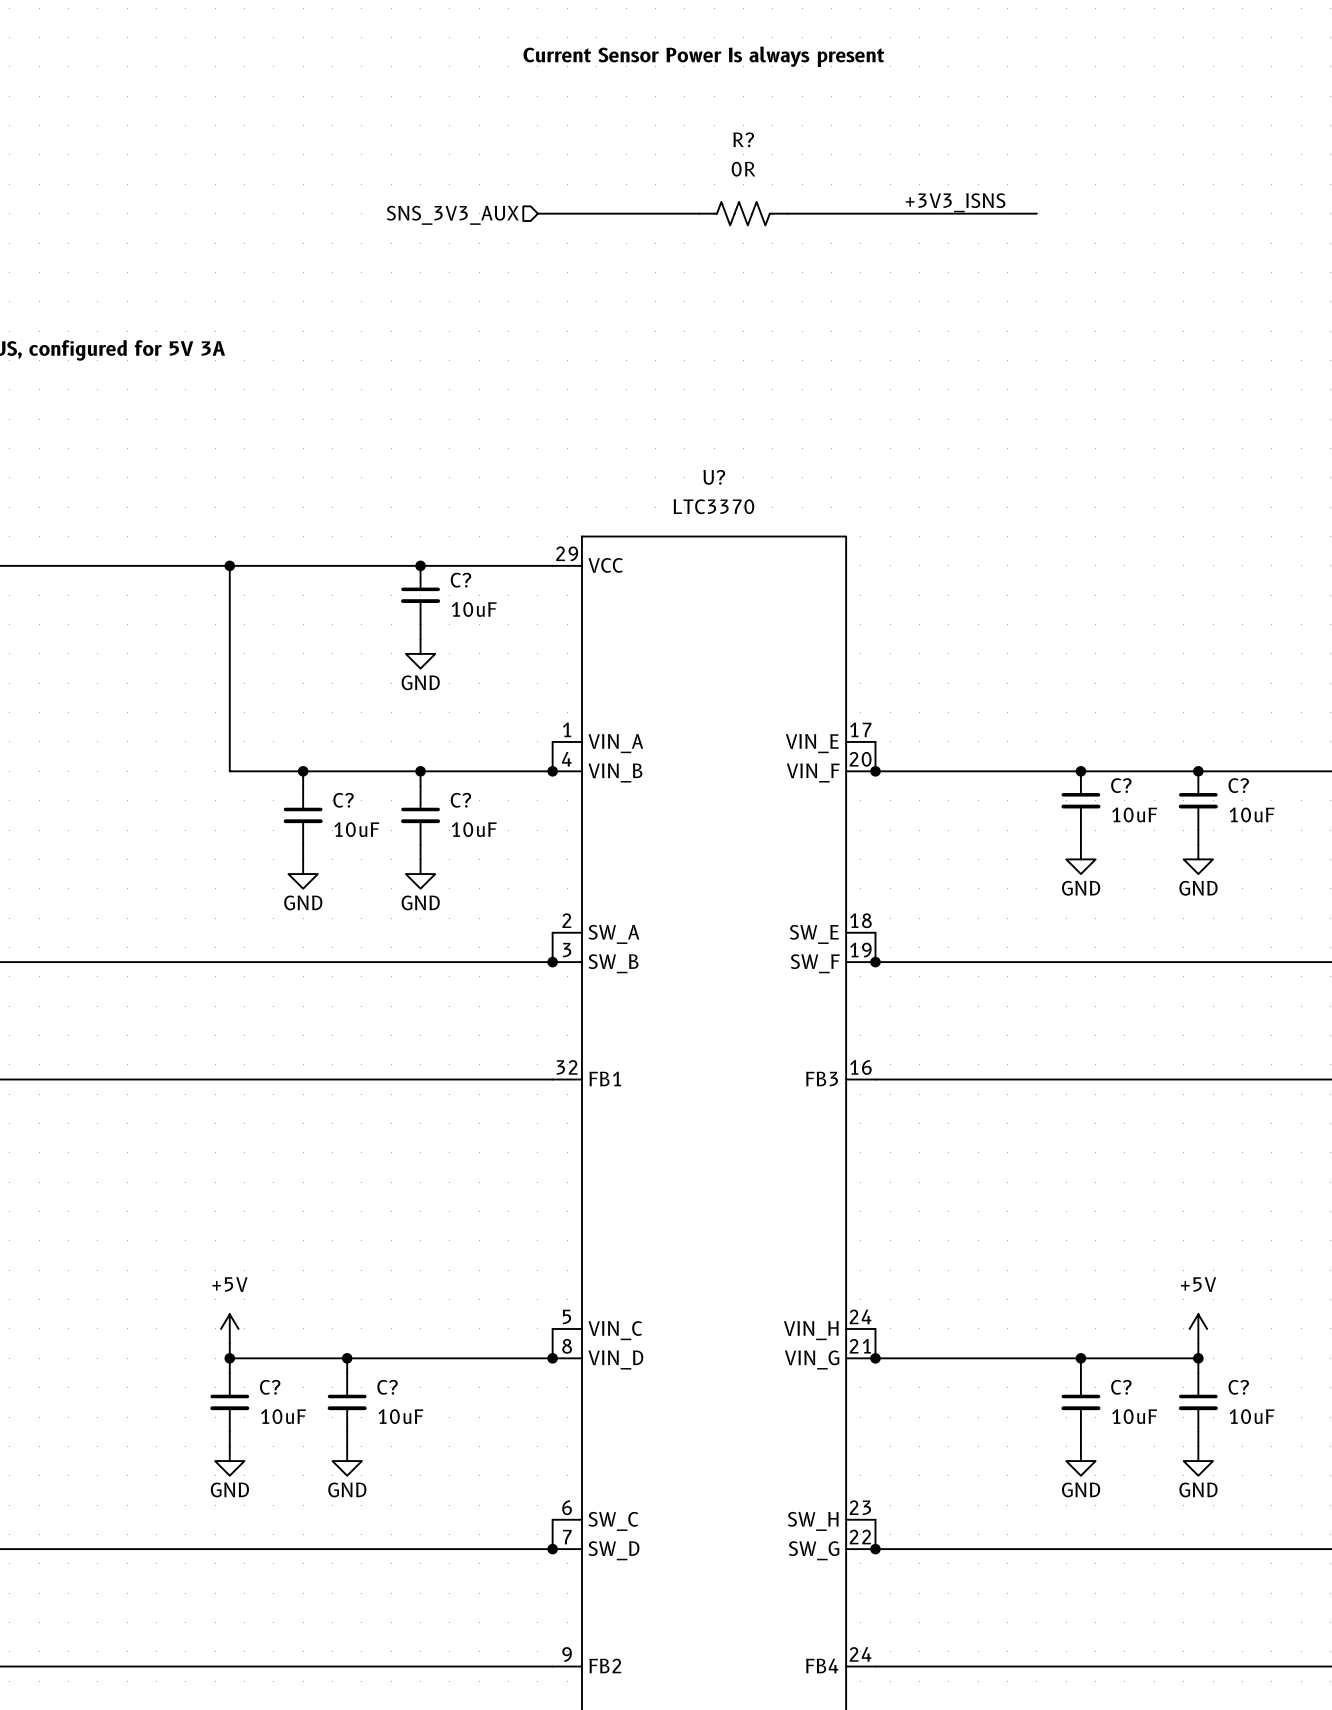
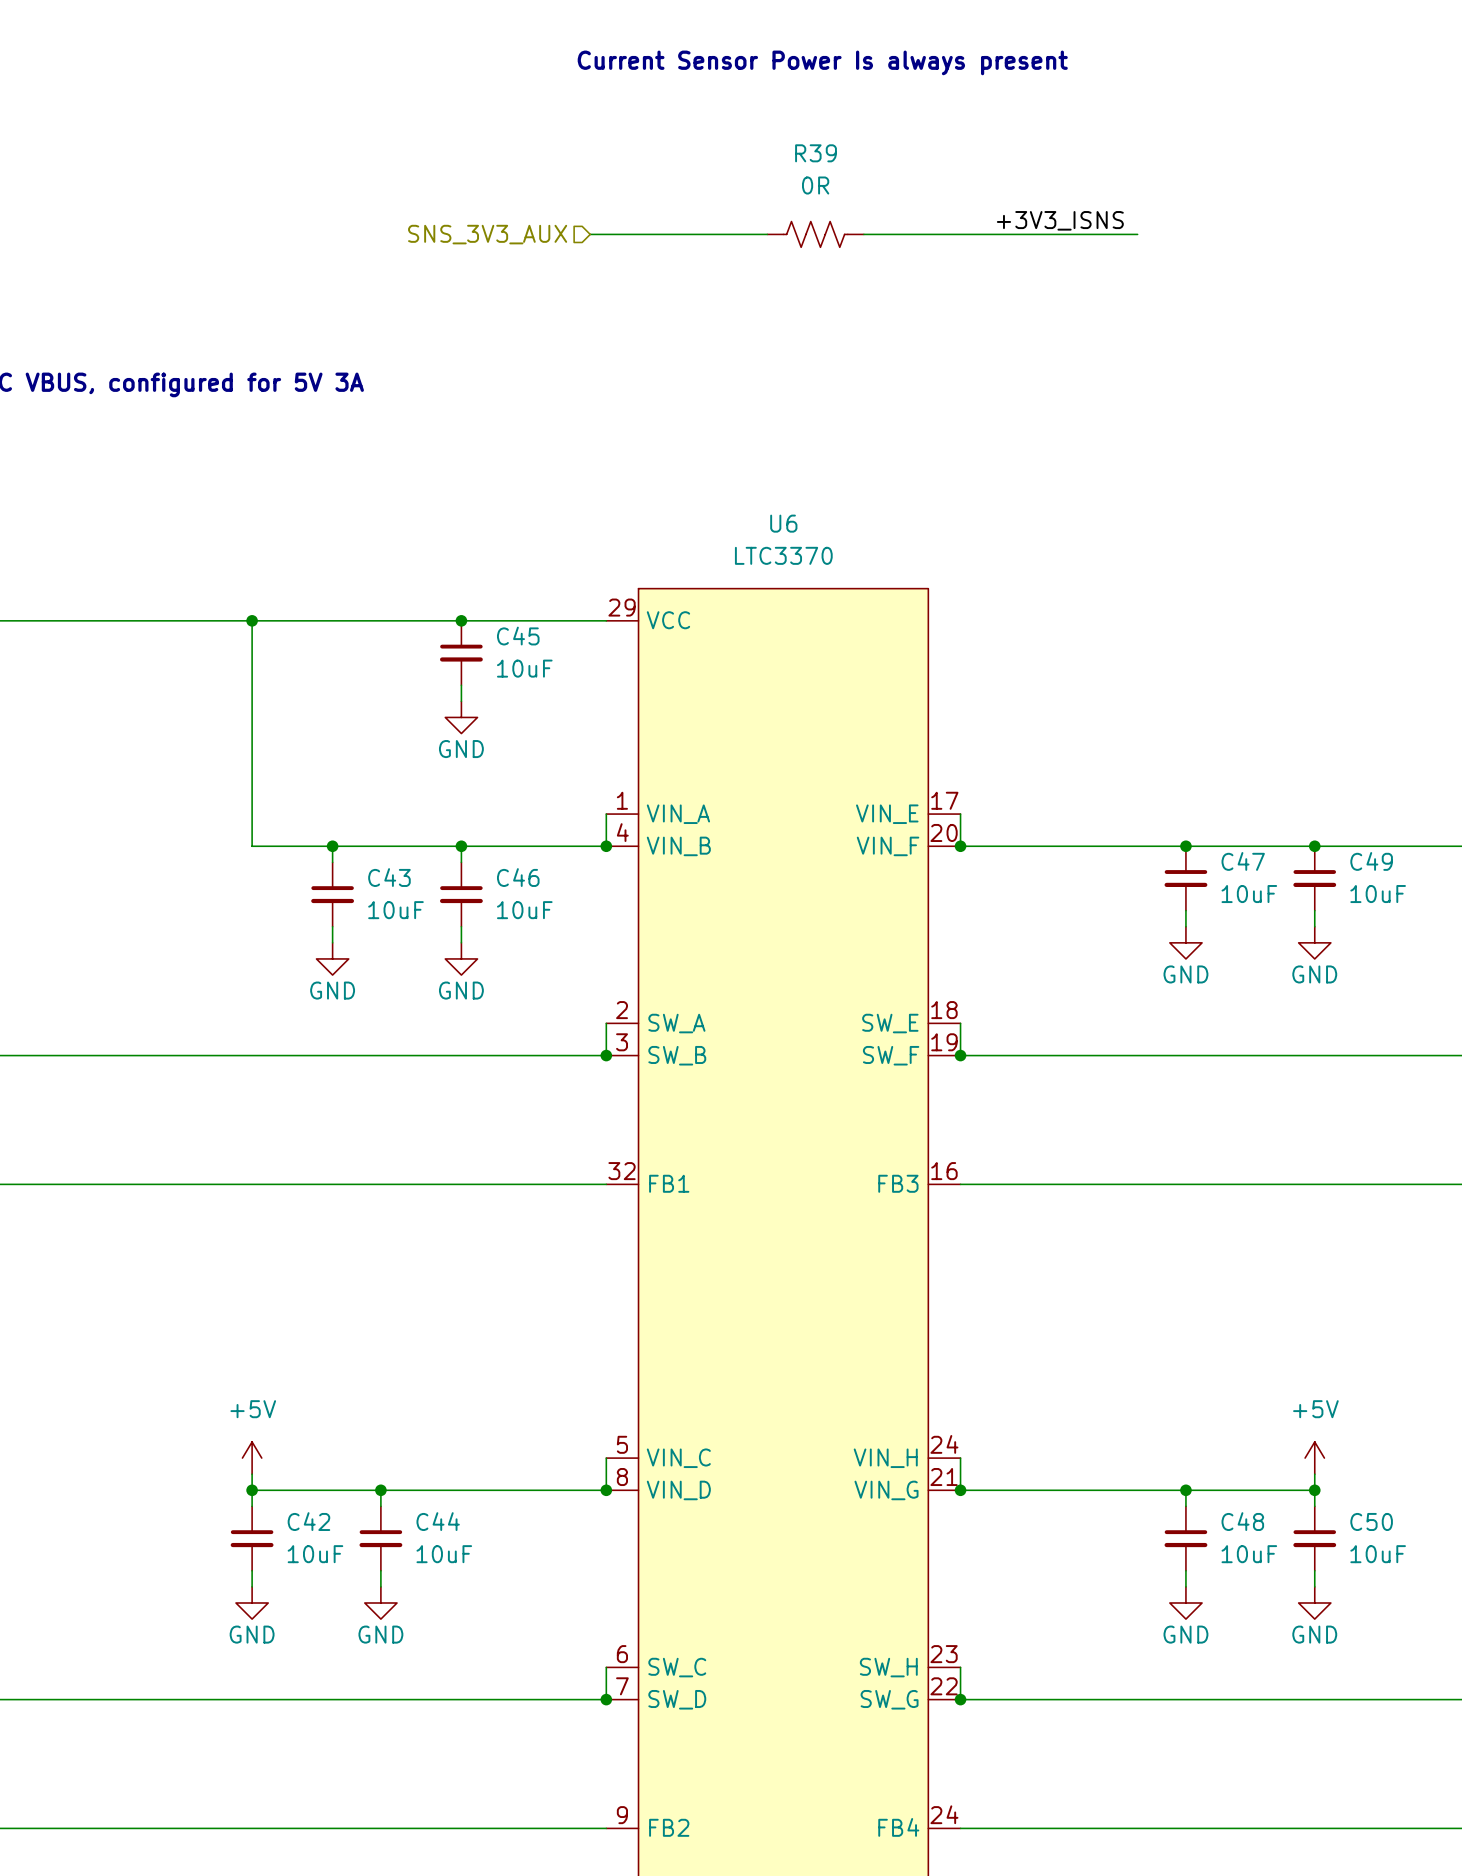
R? name: R? (743, 139) -> R39 (816, 153)
U? name: U? (714, 477) -> U6 (783, 523)
C? name: C? (460, 580) -> C45 (518, 636)
C? name: C? (1121, 785) -> C47 (1243, 861)
C? name: C? (1238, 785) -> C49 (1371, 861)
C? name: C? (343, 800) -> C43 (389, 877)
C? name: C? (460, 800) -> C46 (518, 877)
C? name: C? (270, 1387) -> C42 (308, 1521)
C? name: C? (387, 1387) -> C44 (438, 1521)
C? name: C? (1121, 1387) -> C48 (1242, 1521)
C? name: C? (1238, 1387) -> C50 (1371, 1521)

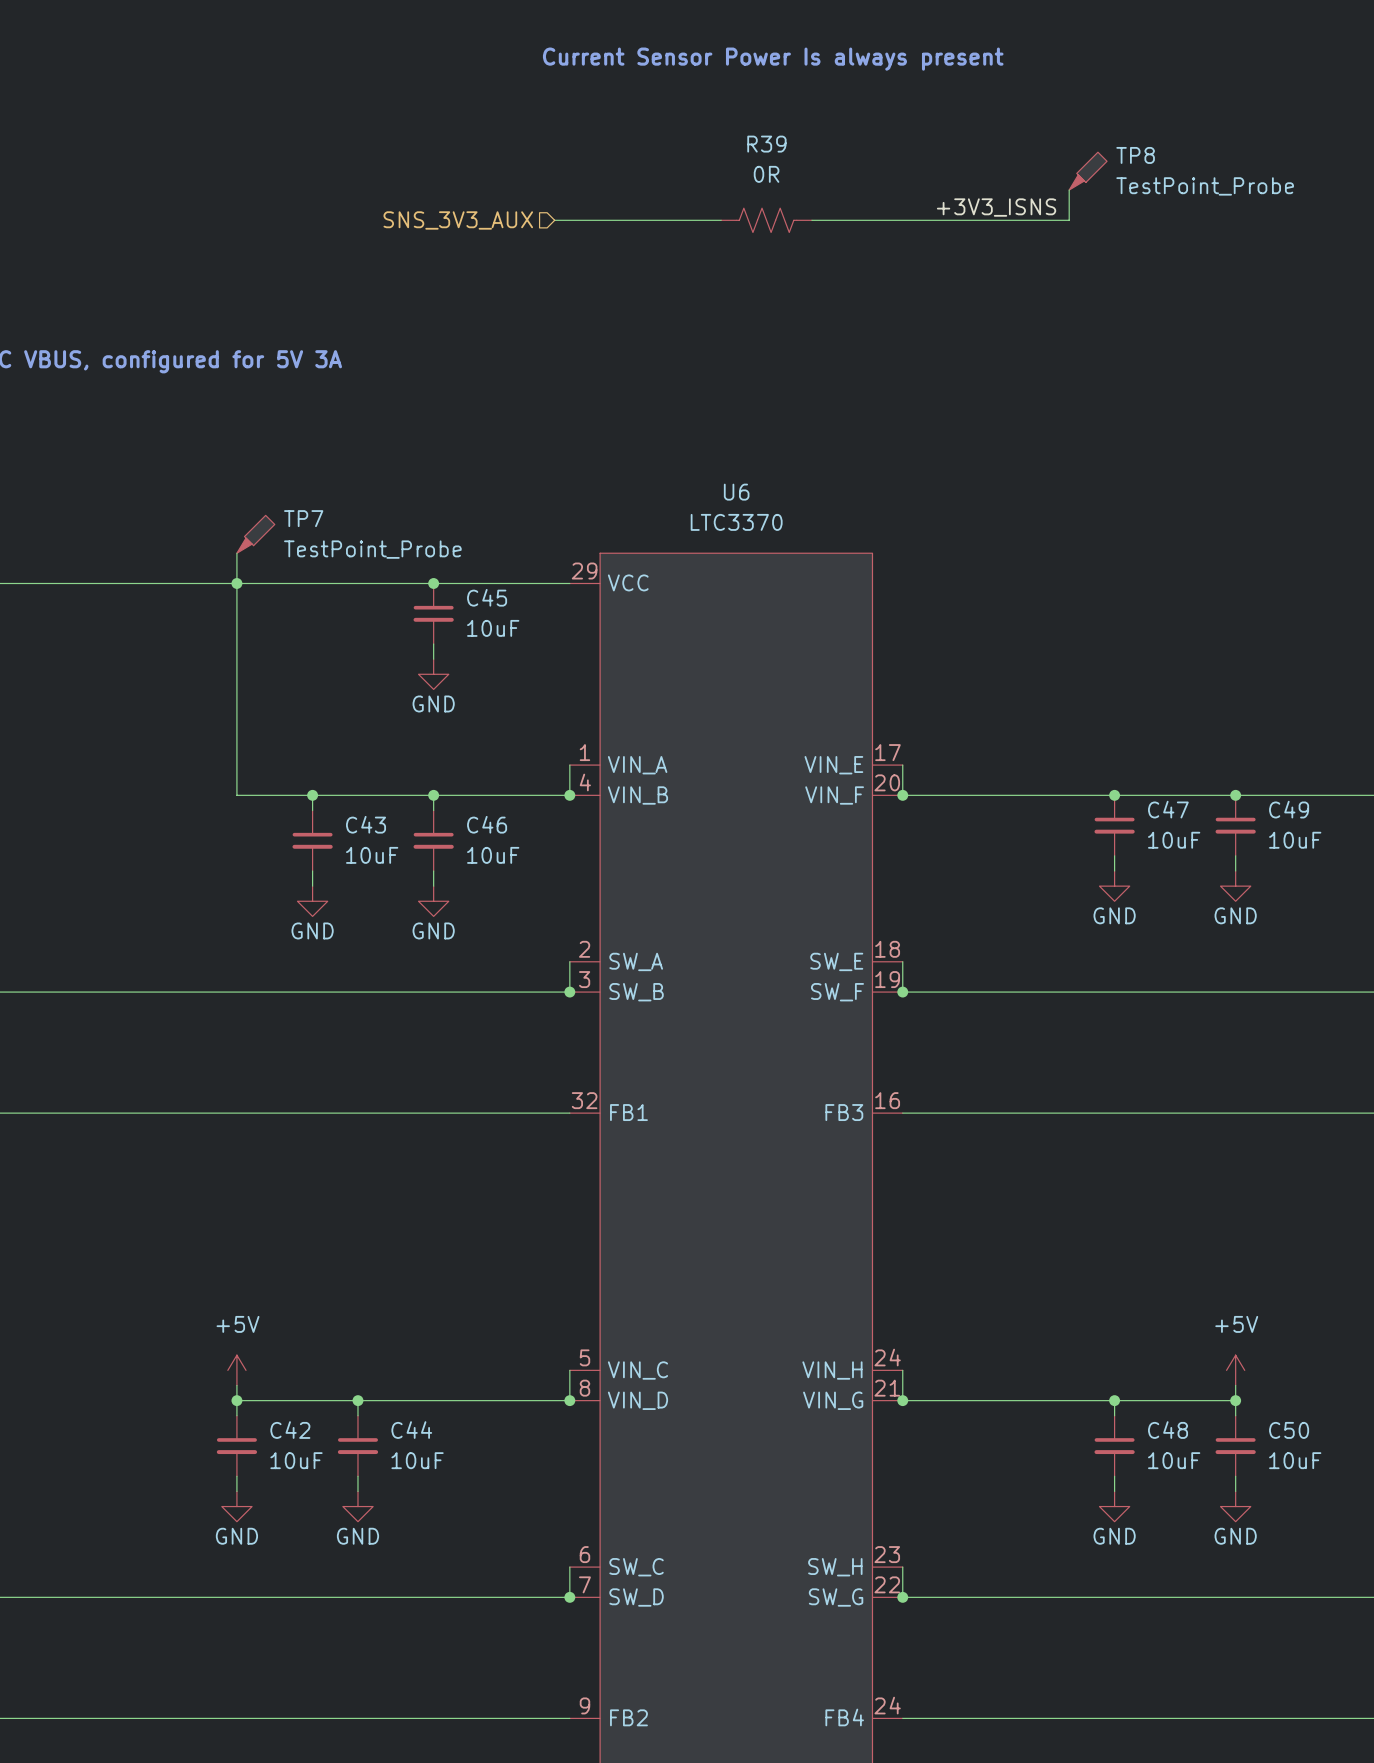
TP8: none -> TestPoint_Probe (1088, 171)
wire: none -> (1069, 190) (1069, 220)
TP7: none -> TestPoint_Probe (255, 534)
wire: none -> (236, 553) (236, 583)

